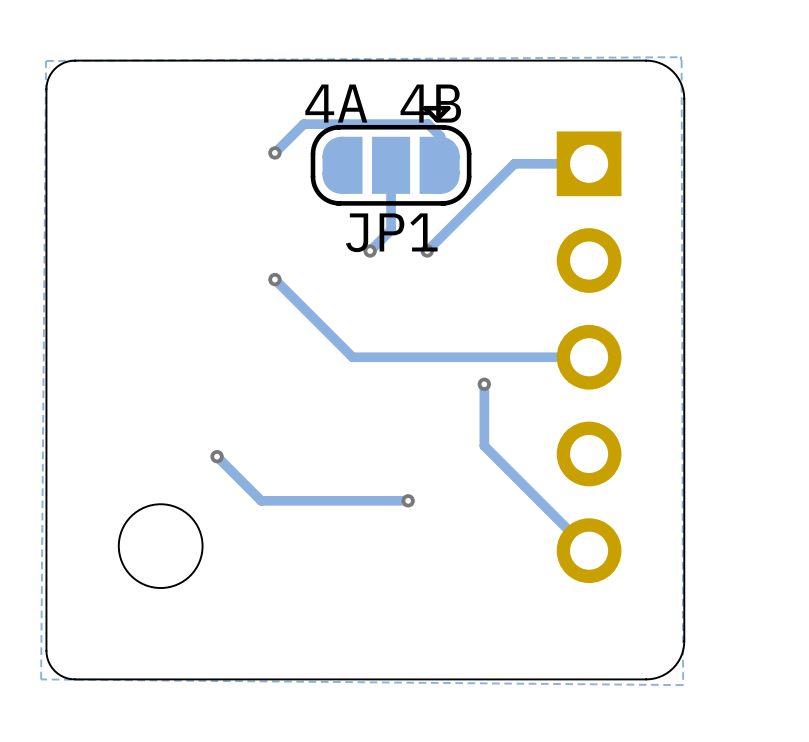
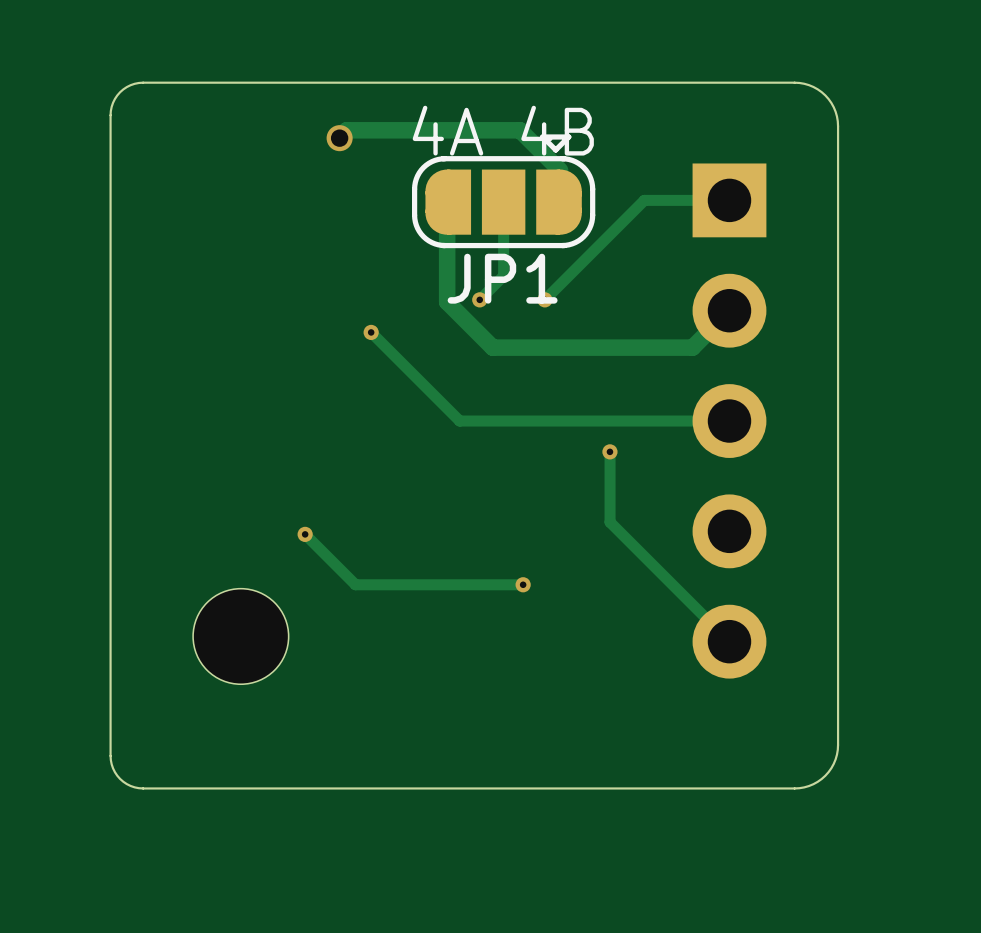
zone outline: (681, 57) (46, 60) (41, 679) (683, 685) (681, 57) -> none
via: none -> (339, 138)
track: (440, 137) (428, 124) (303, 124) (274, 152) -> (560, 170) (520, 130) (346, 130) (339, 137)
via: (274, 152) -> none
track: none -> (447, 202) (447, 302) (492, 347) (692, 347) (729, 310)

